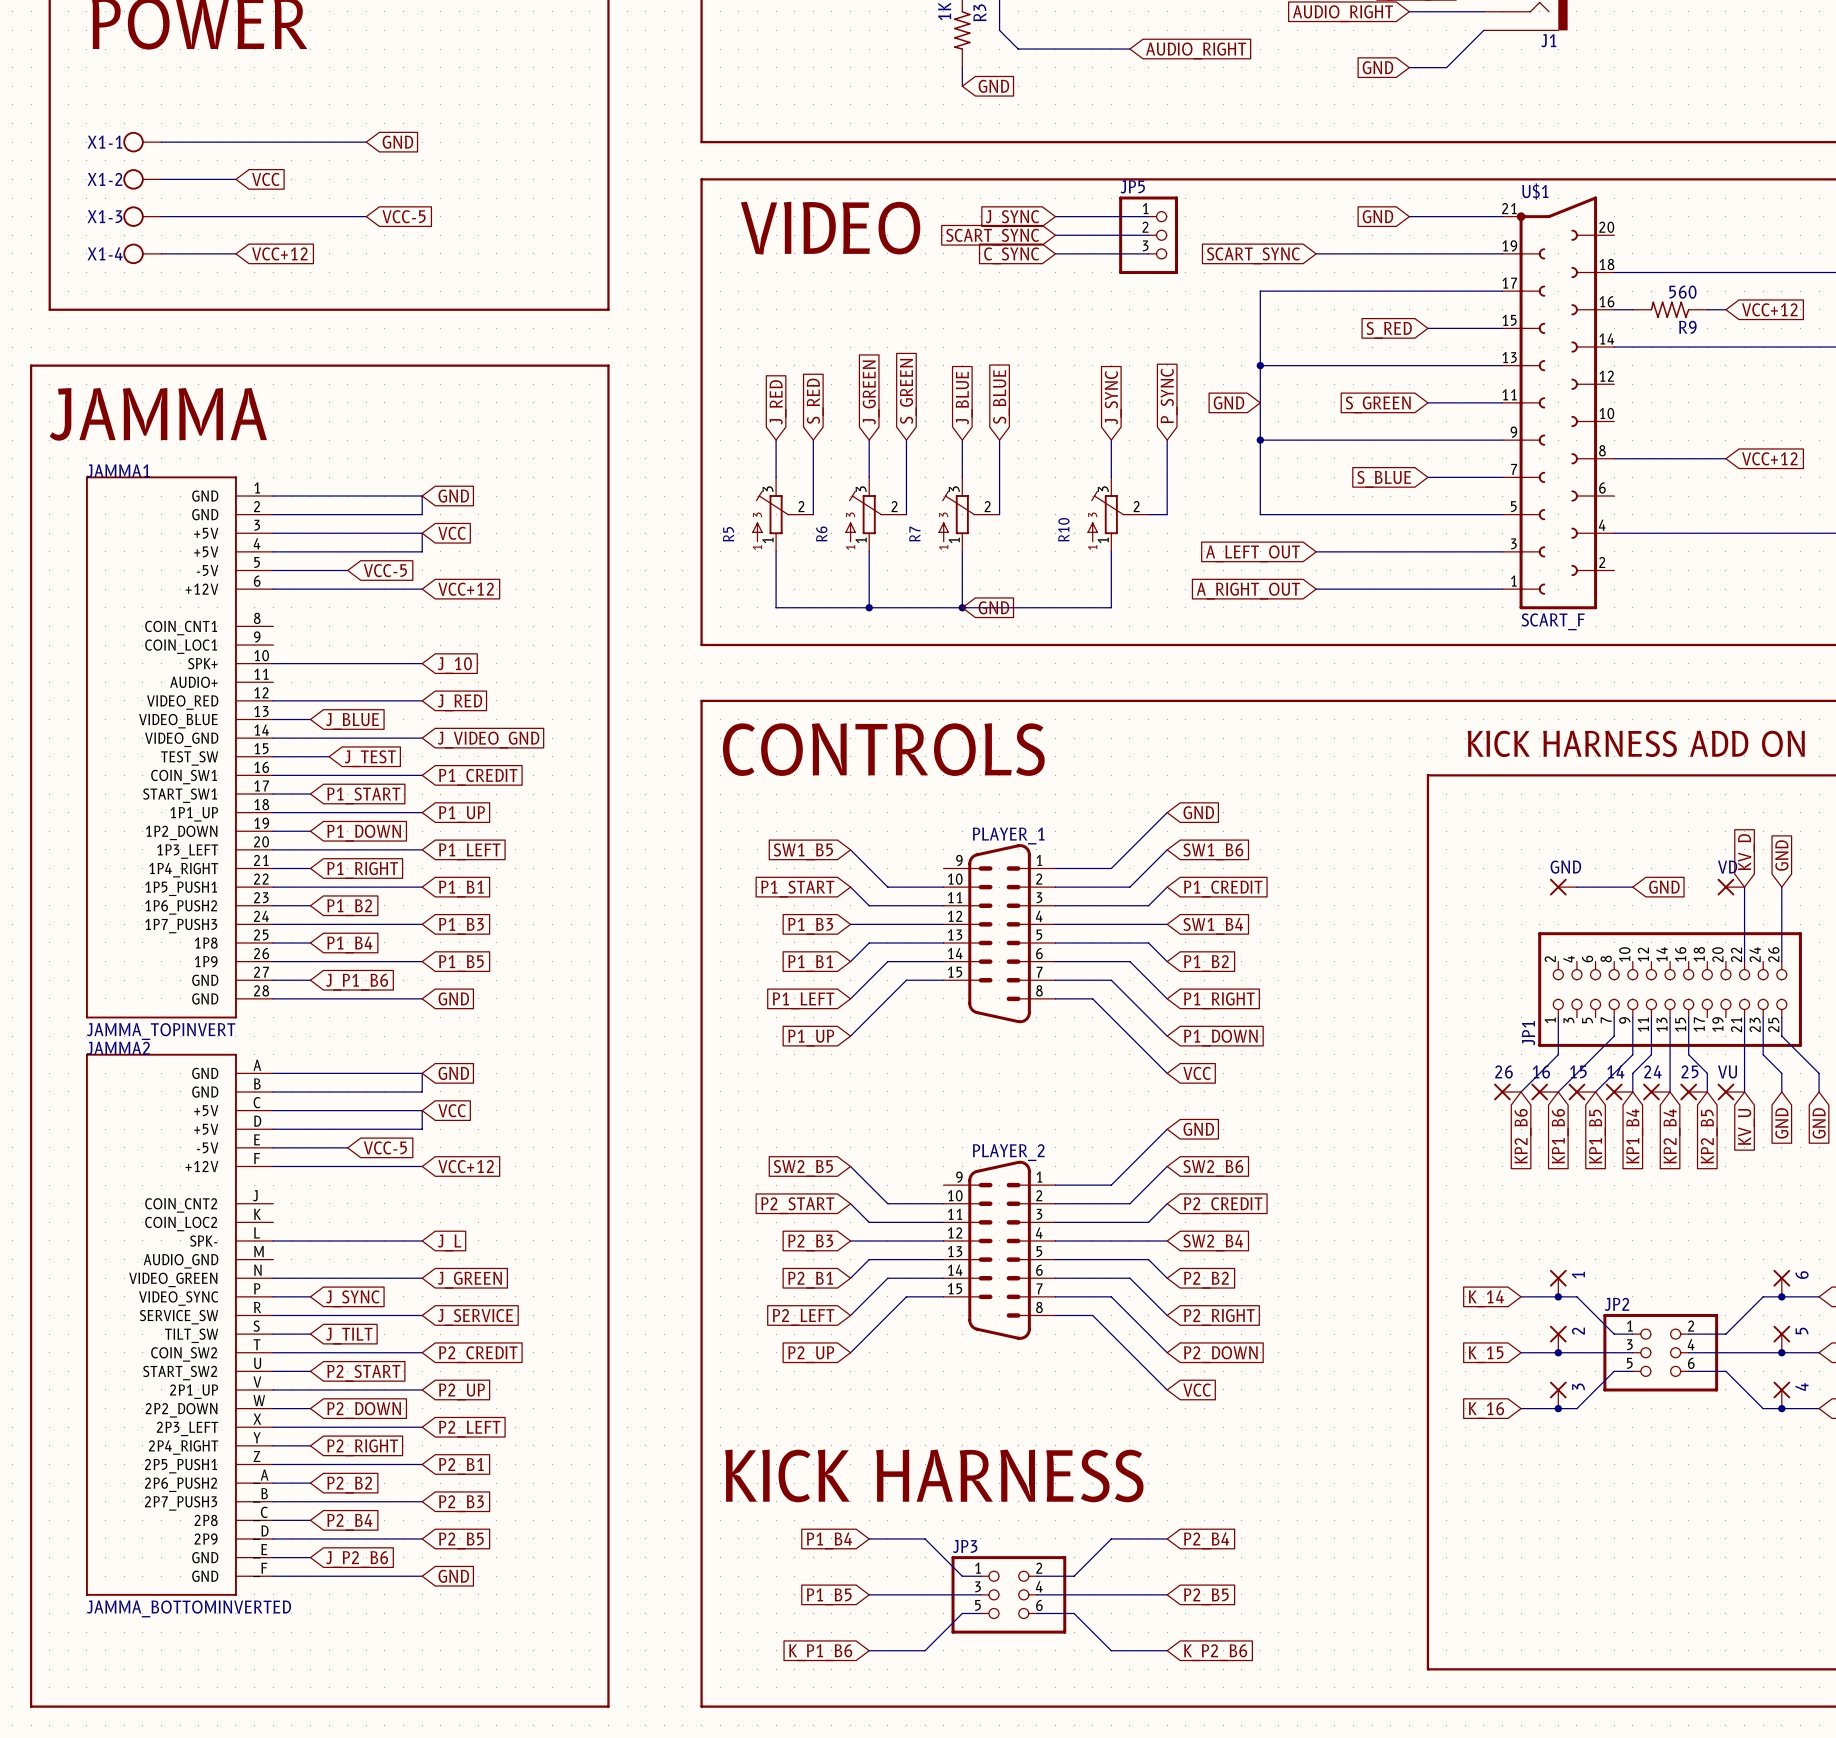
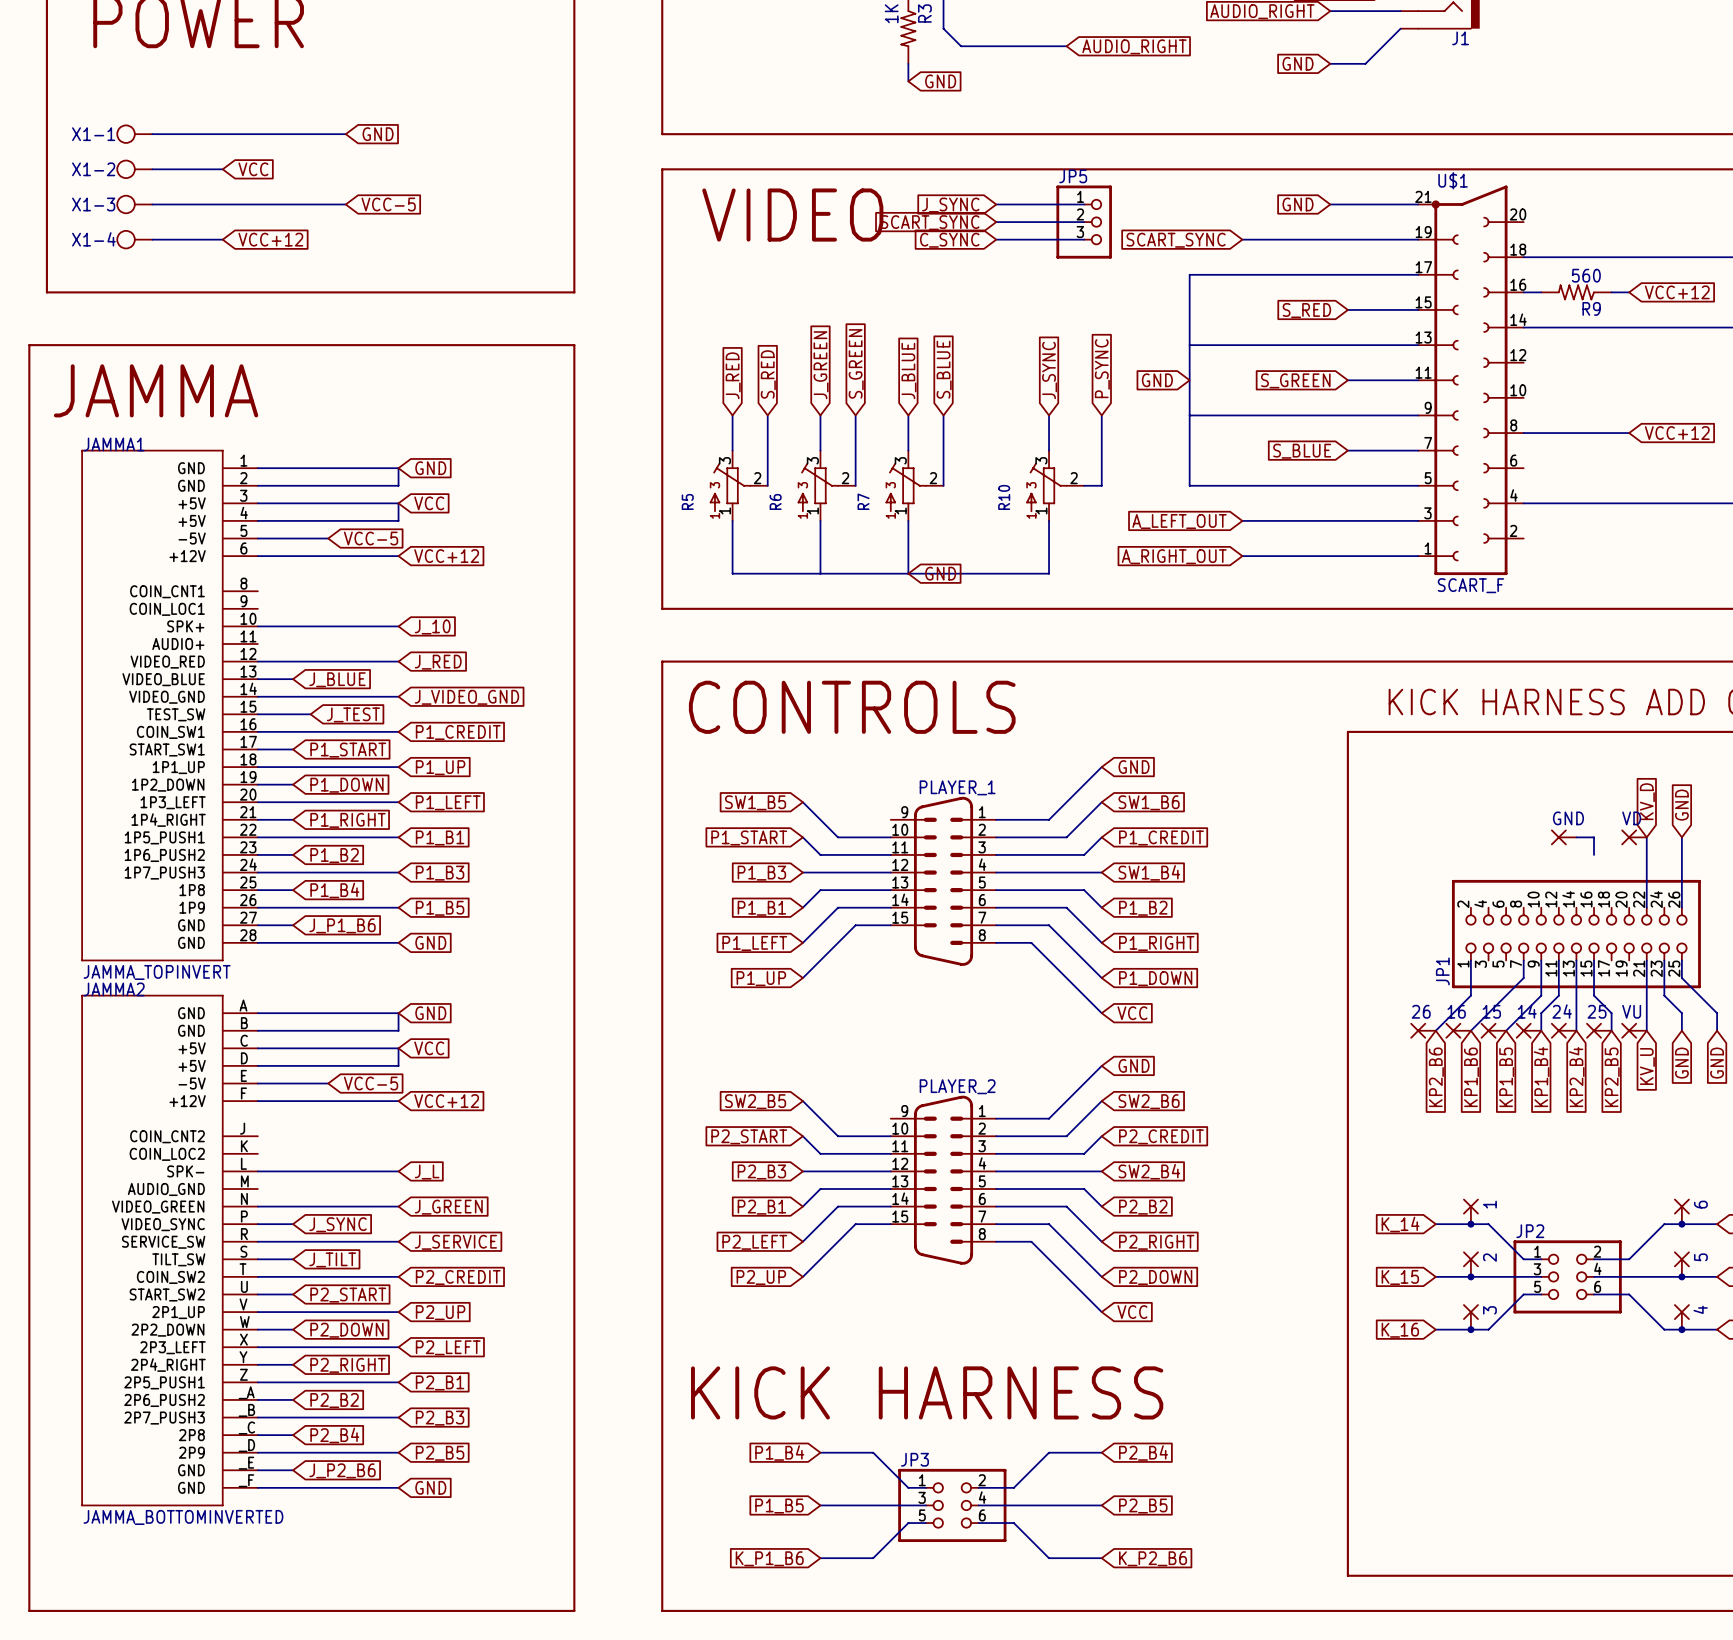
junction: (1260, 365) -> none
junction: (1260, 440) -> none
junction: (869, 607) -> none
junction: (962, 607) -> none
GND position: (1563, 887) -> (1563, 837)
wire: (1576, 887) (1632, 887) -> none
global label: GND (1664, 887) -> none
wire: none -> (1576, 837) (1594, 837) (1594, 854)

